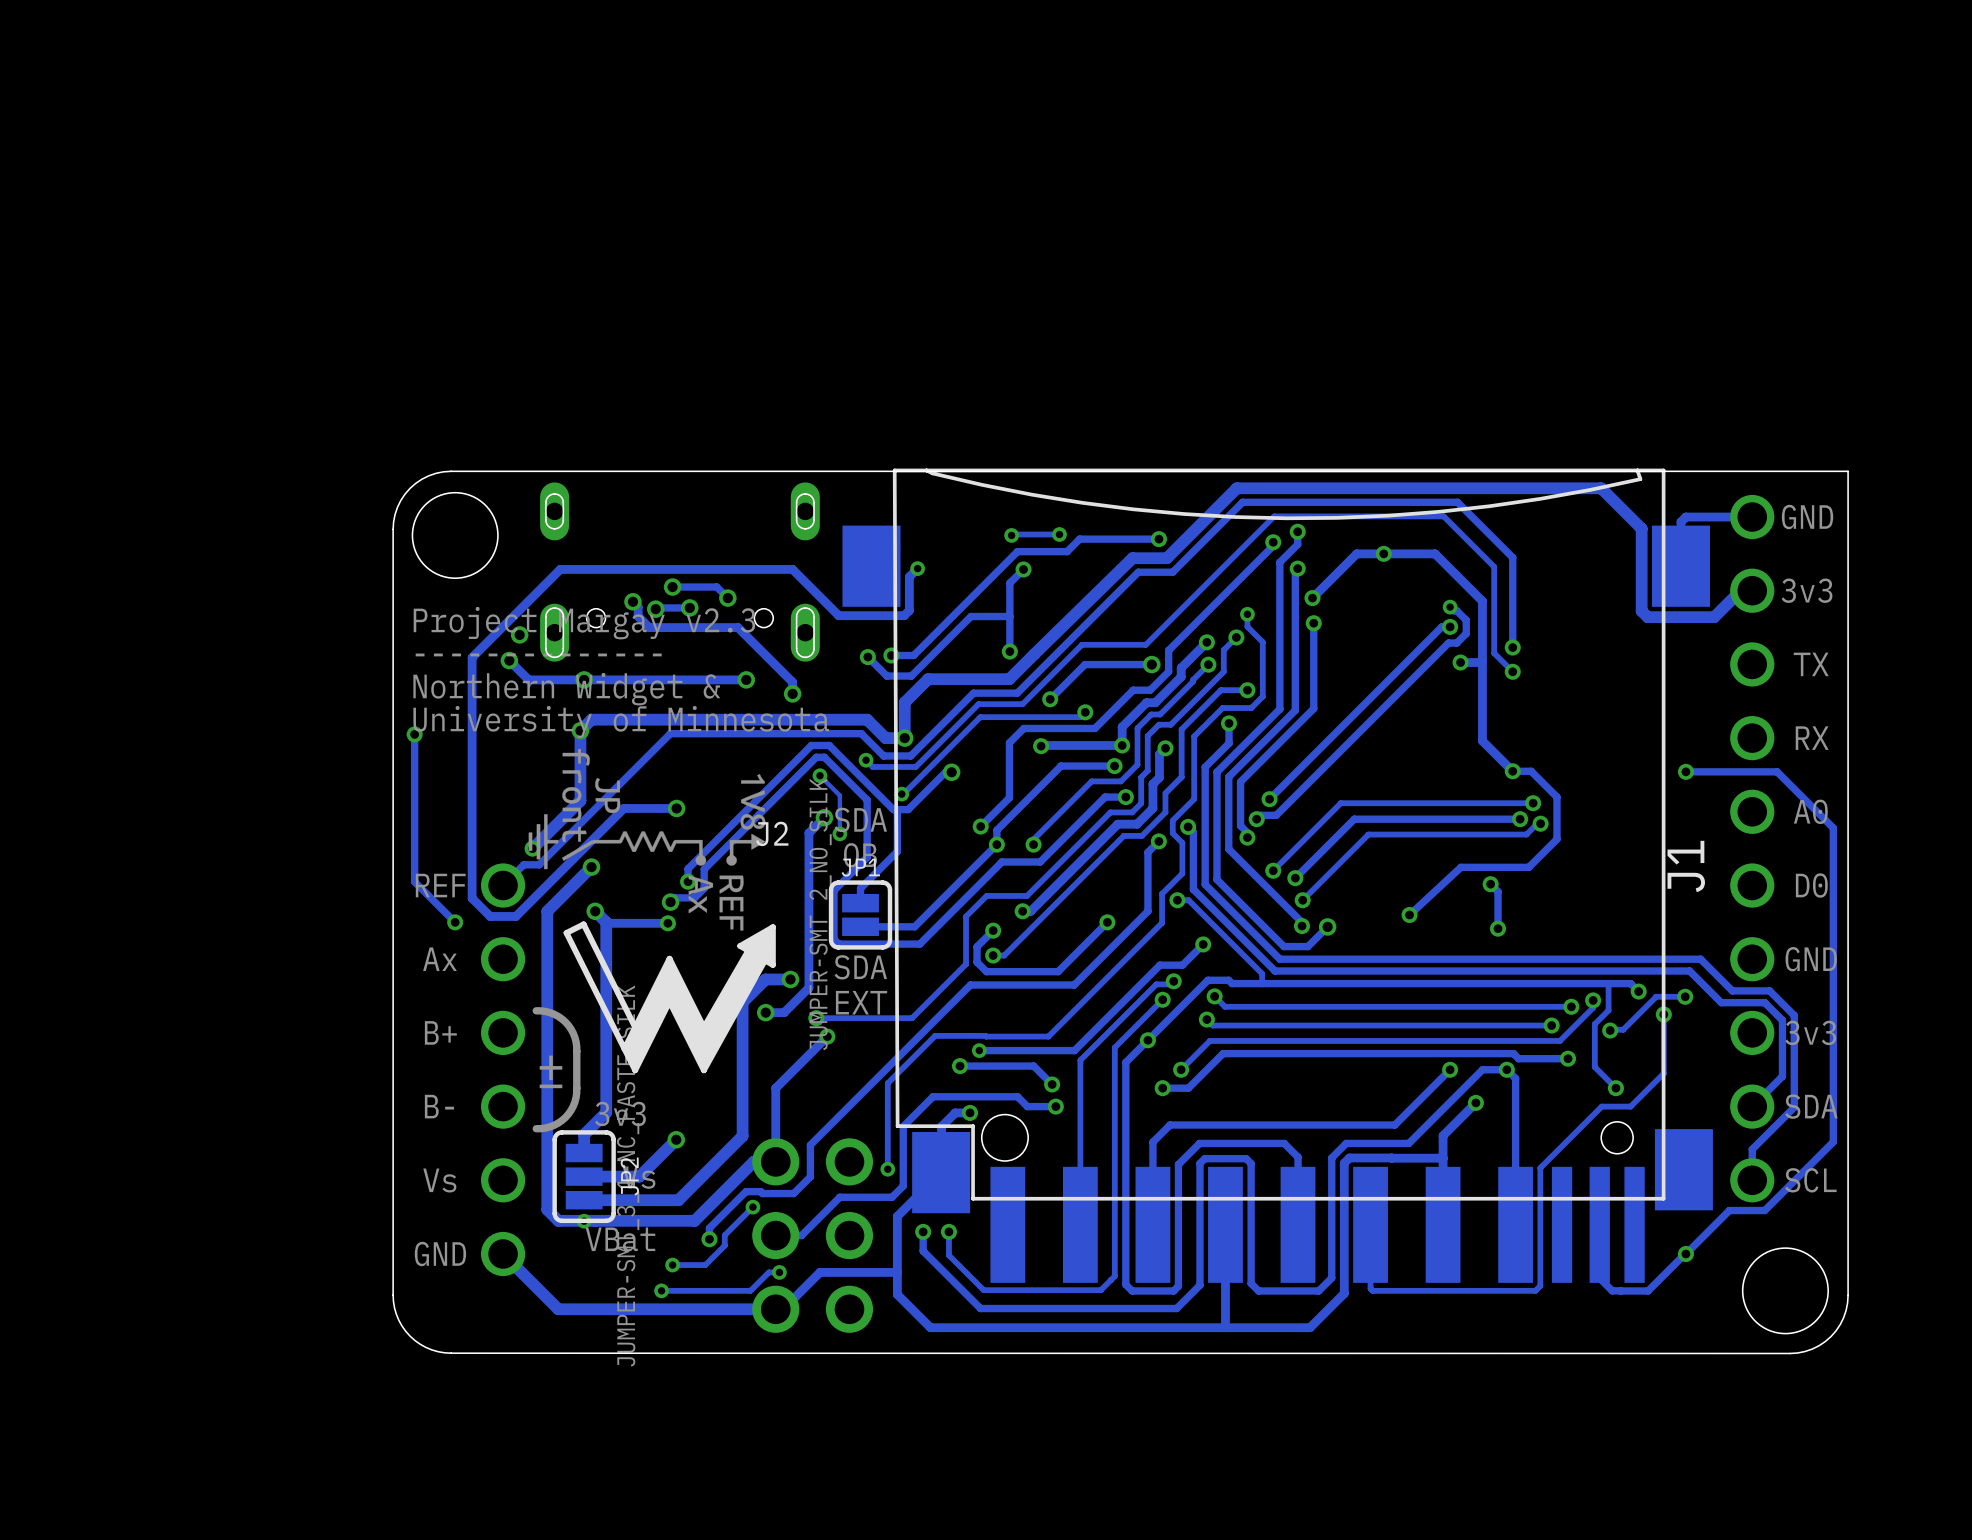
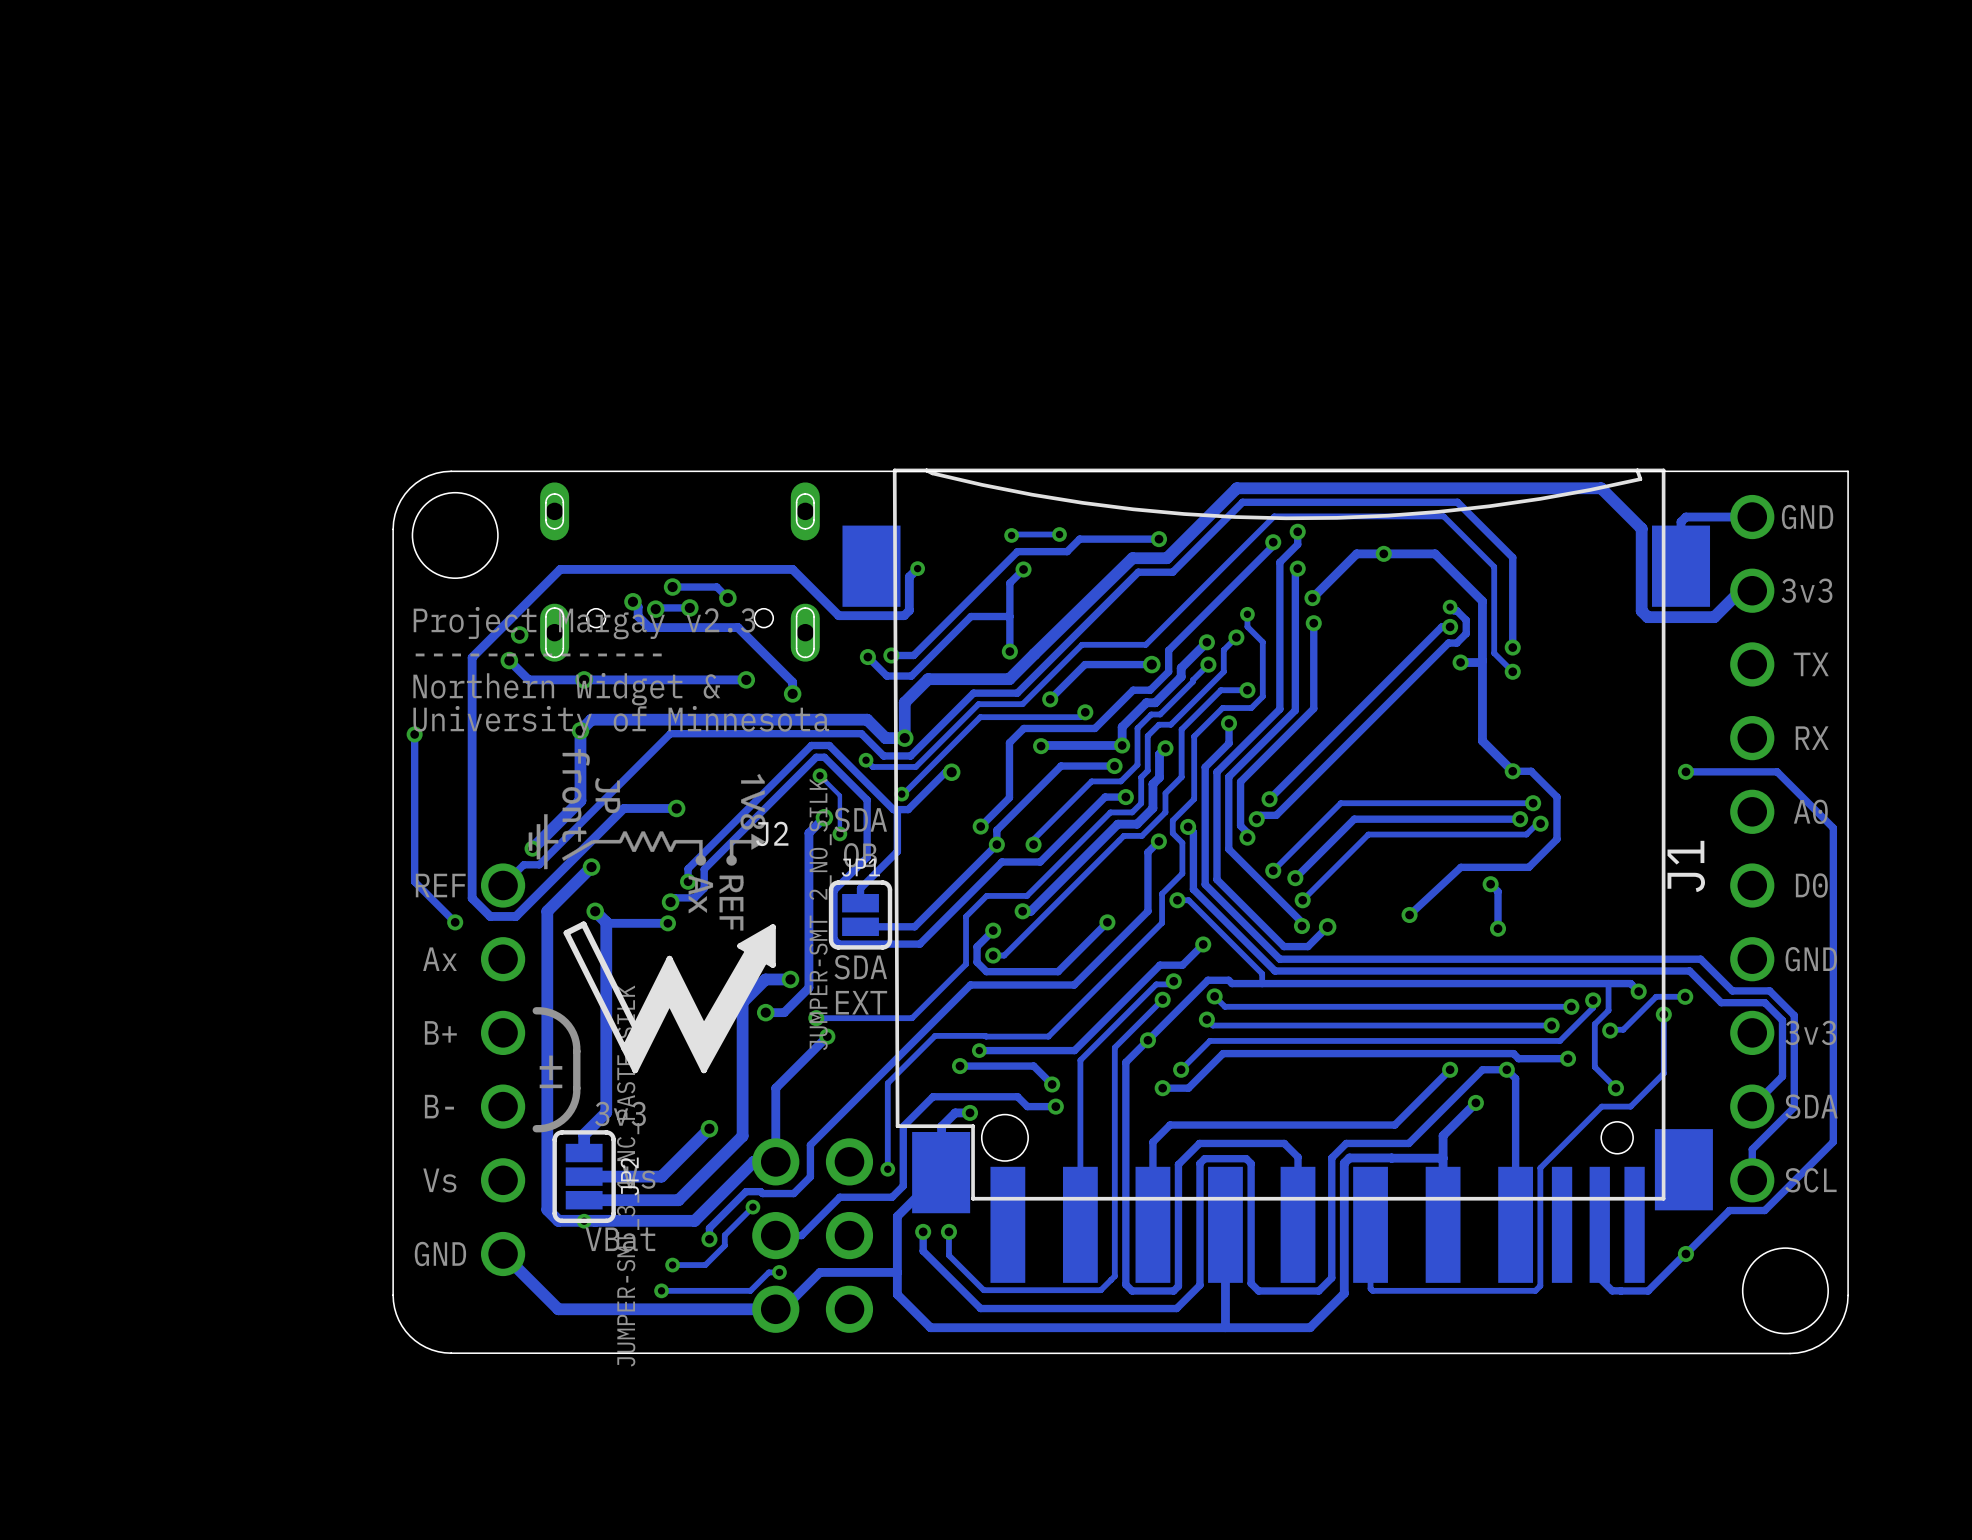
track: (676, 1139) (639, 1176) -> (709, 1128) (661, 1176) (639, 1176)
via position: (676, 1139) -> (709, 1128)

